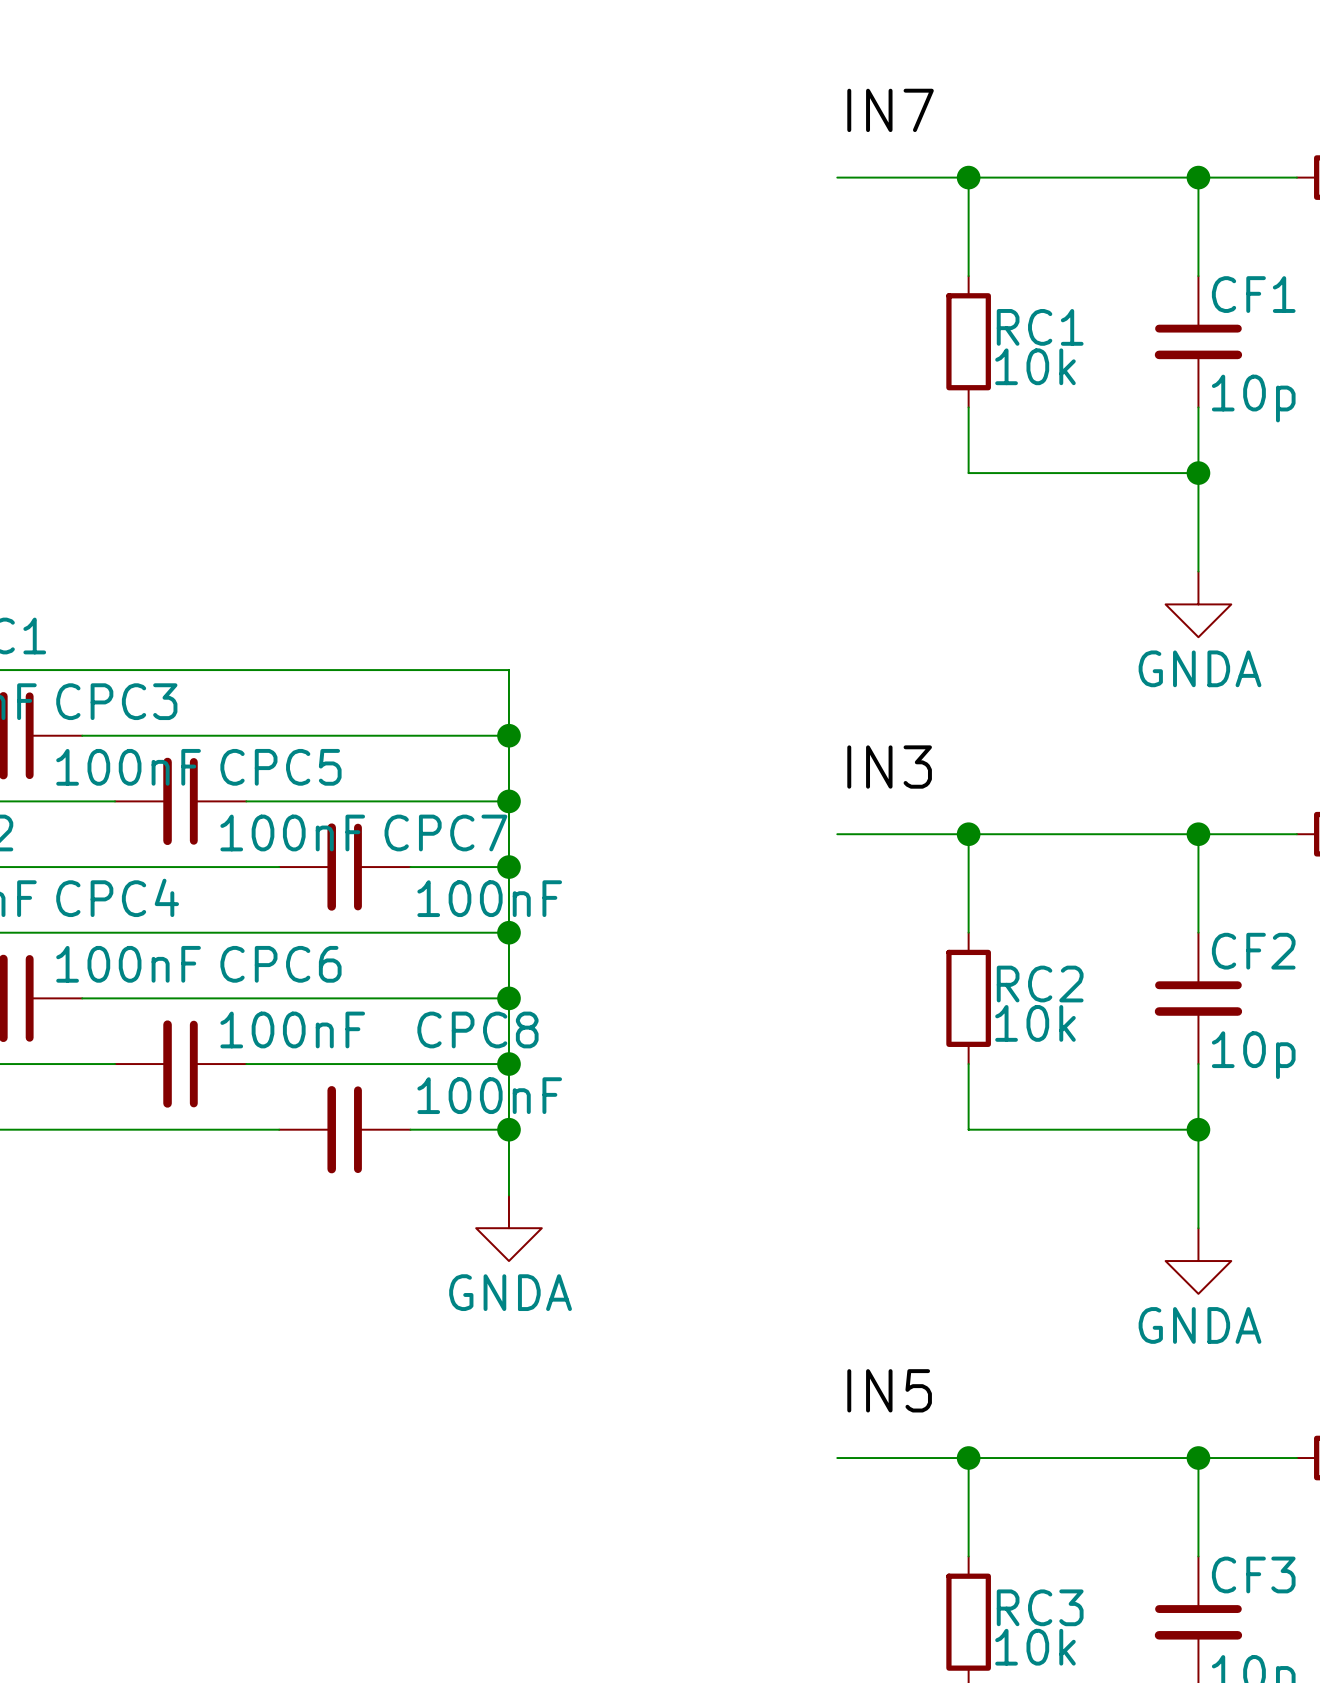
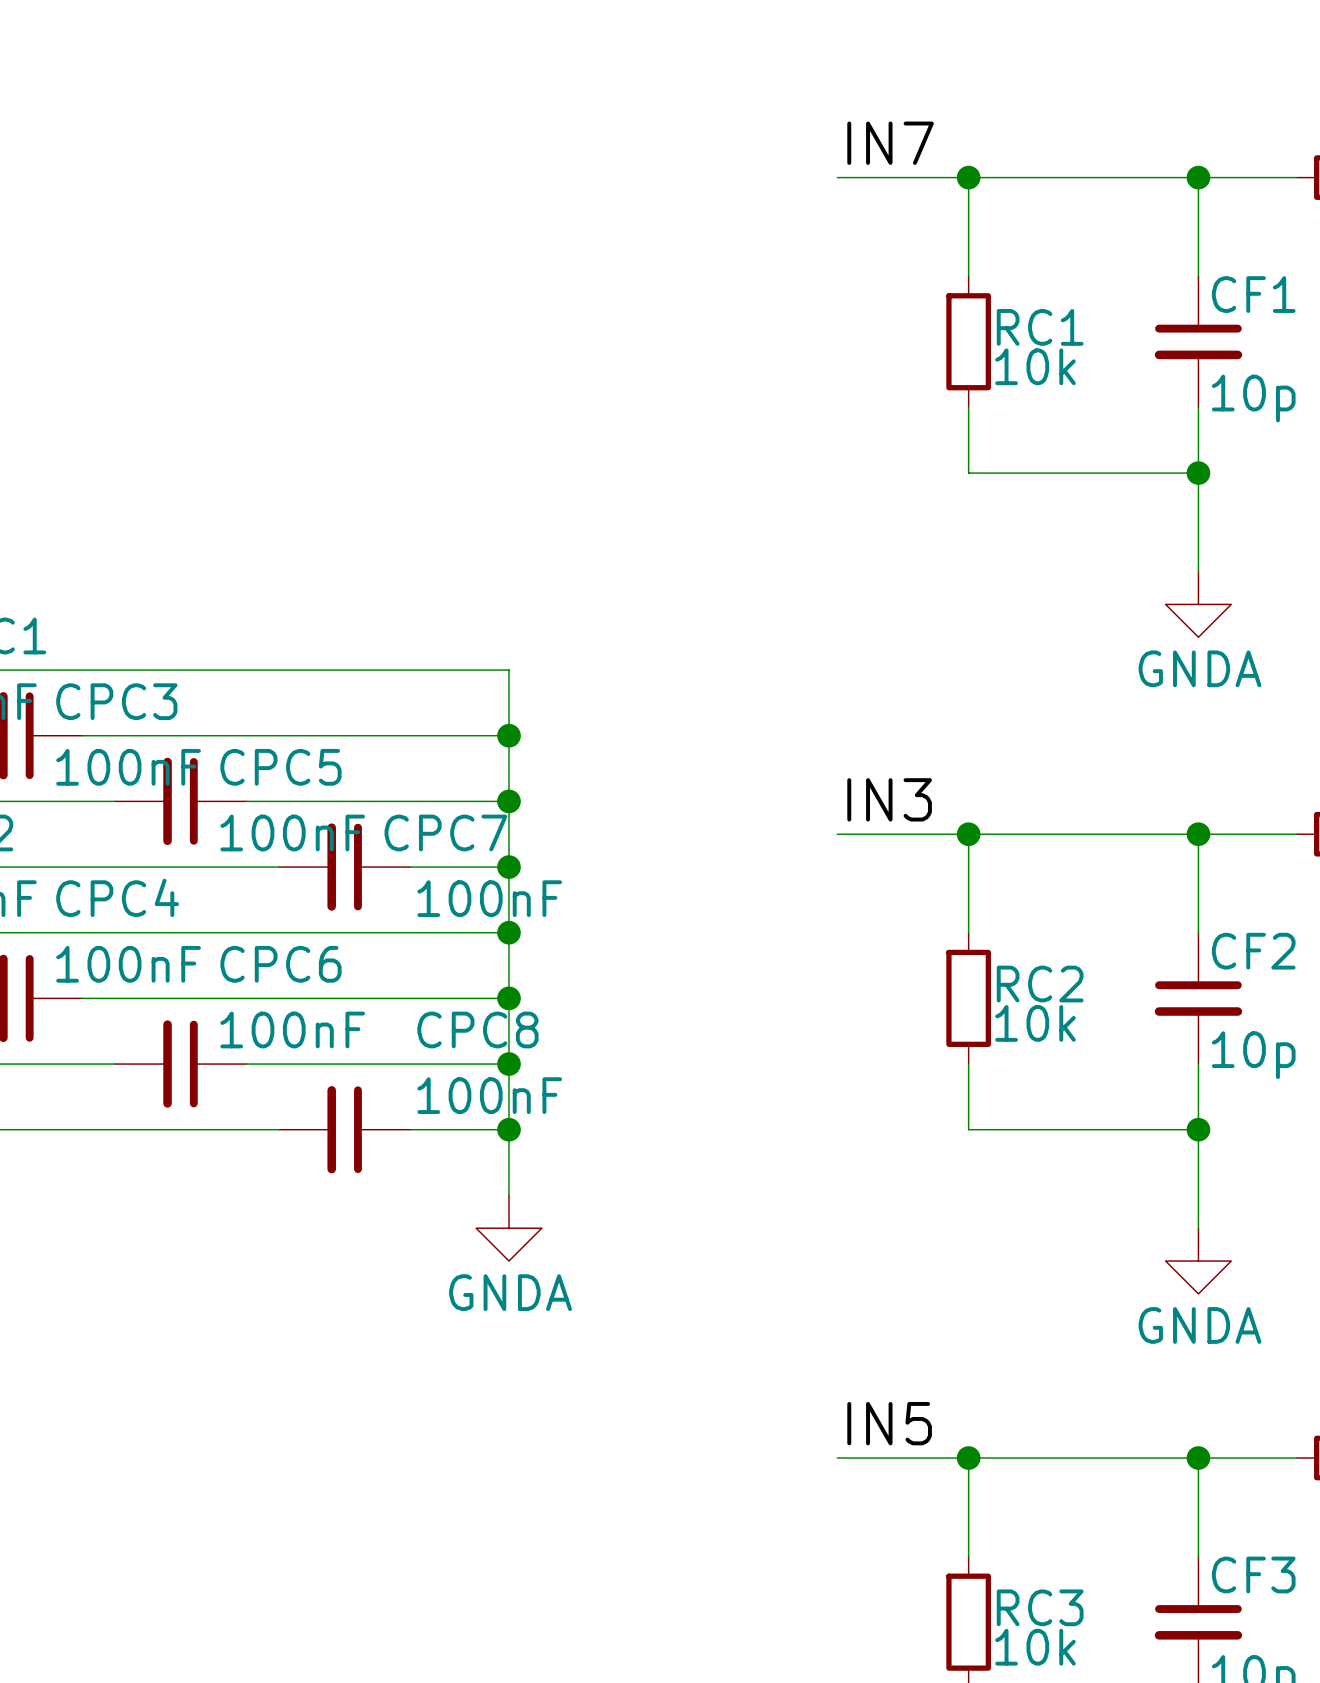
label position: IN7 (890, 110) -> IN7 (890, 143)
label position: IN3 (889, 767) -> IN3 (889, 799)
label position: IN5 (889, 1390) -> IN5 (889, 1423)

